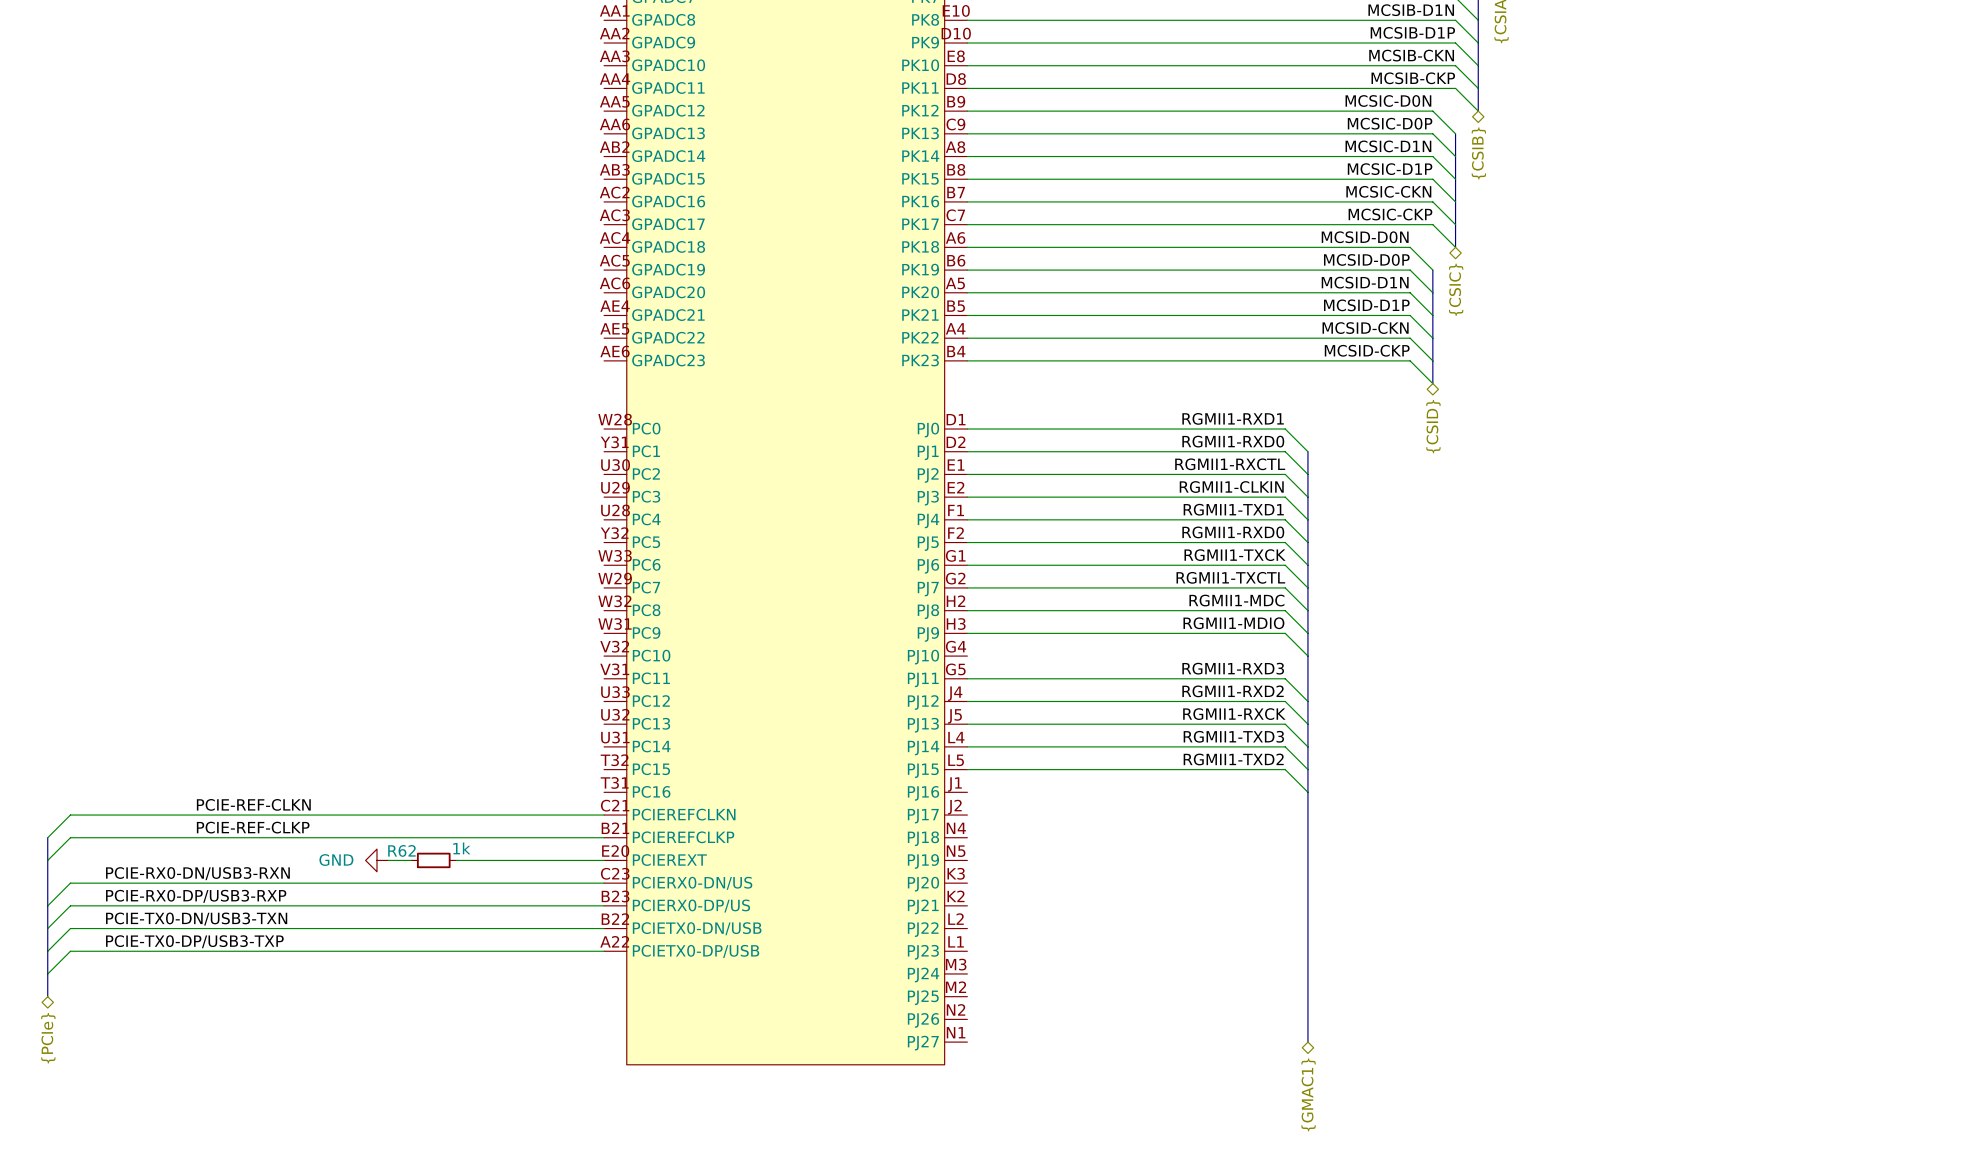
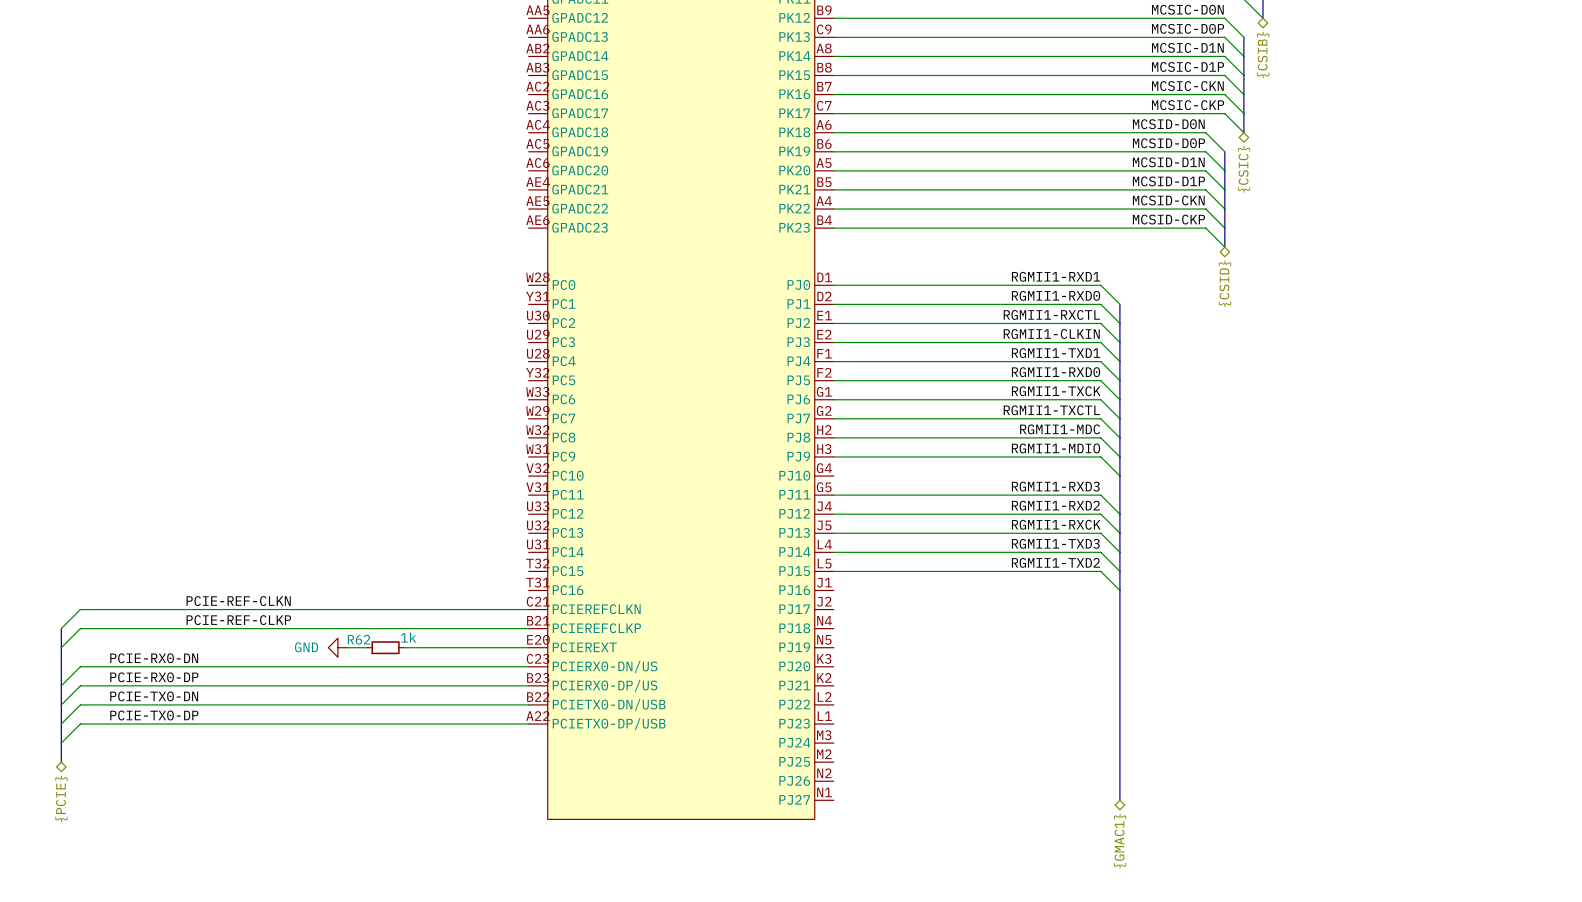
label: PCIE-RX0-DN/USB3-RXN (197, 873) -> PCIE-RX0-DN (154, 658)
label: PCIE-RX0-DP/USB3-RXP (196, 896) -> PCIE-RX0-DP (154, 677)
label: PCIE-TX0-DN/USB3-TXN (196, 919) -> PCIE-TX0-DN (154, 696)
label: PCIE-TX0-DP/USB3-TXP (194, 941) -> PCIE-TX0-DP (154, 715)
hierarchical label: {PCIe} (48, 1038) -> {PCIE} (61, 798)

